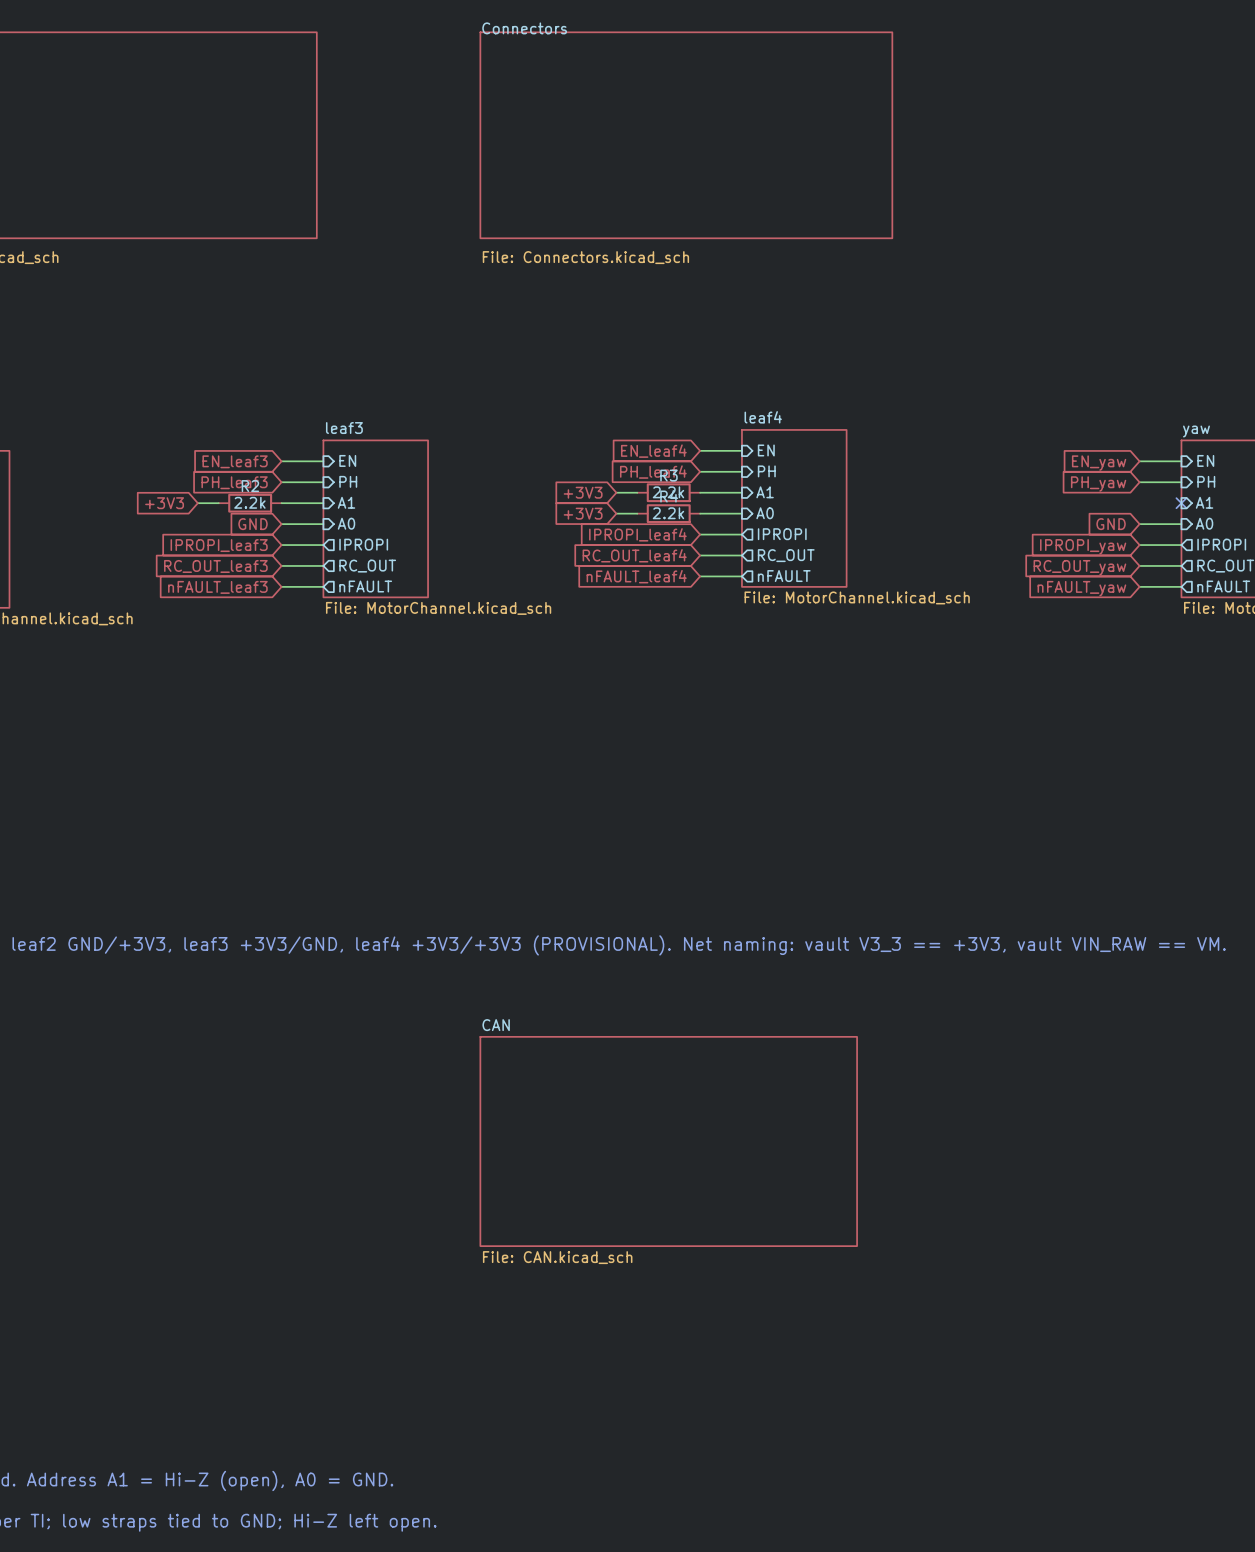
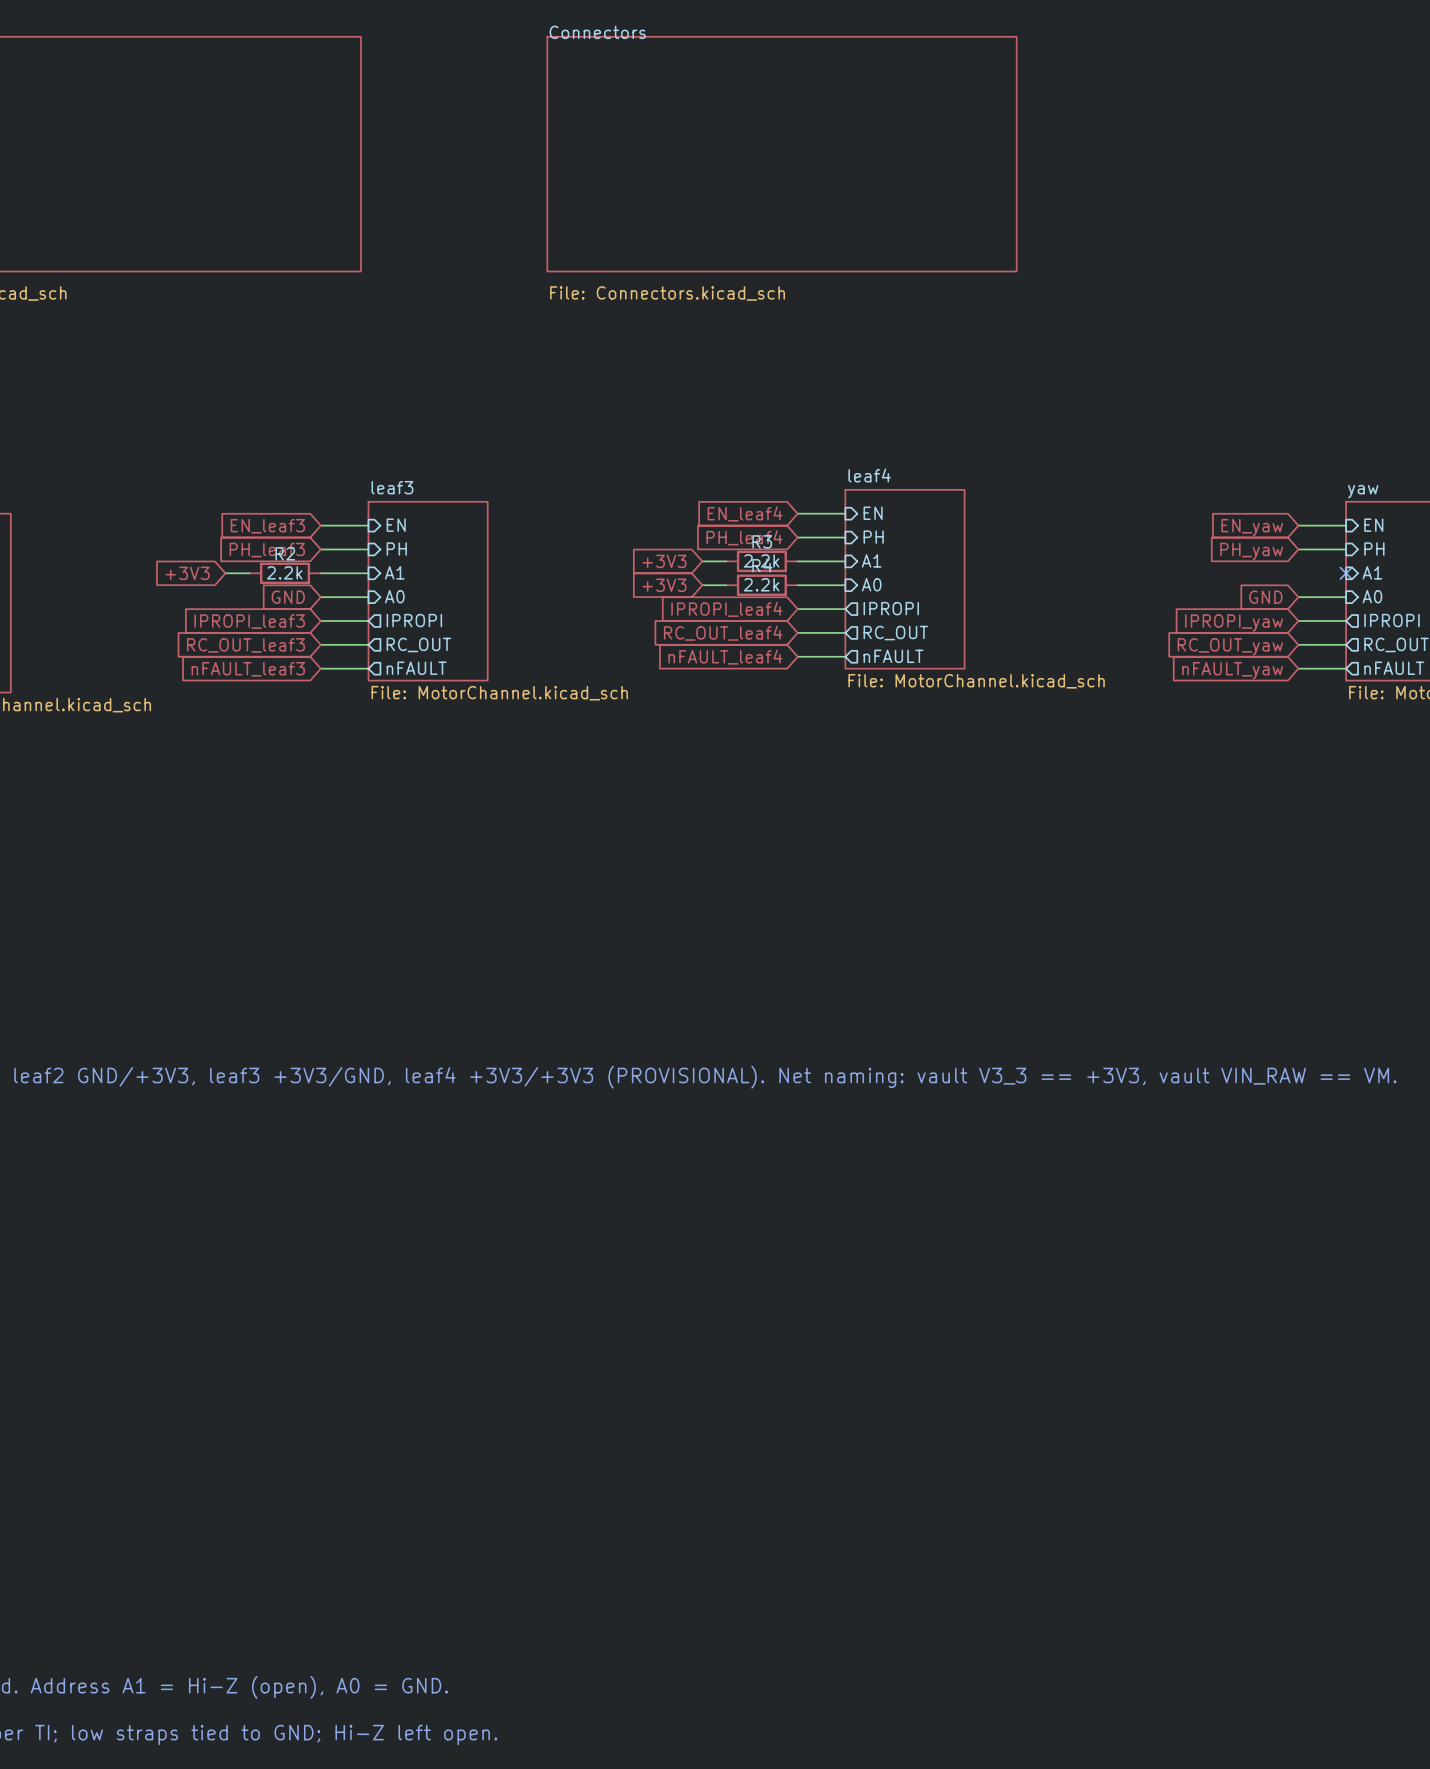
sheet CAN: File: CAN.kicad_sch (668, 1141) -> none

